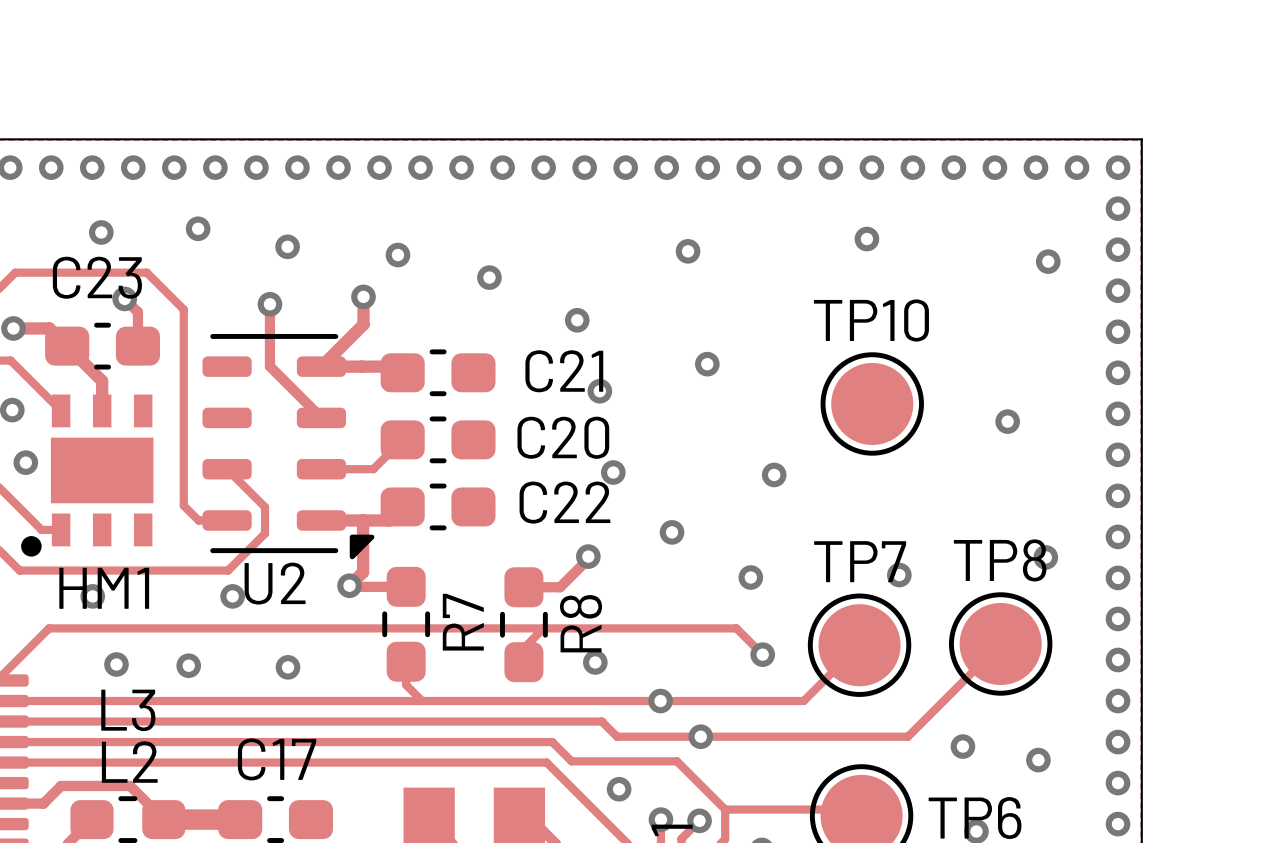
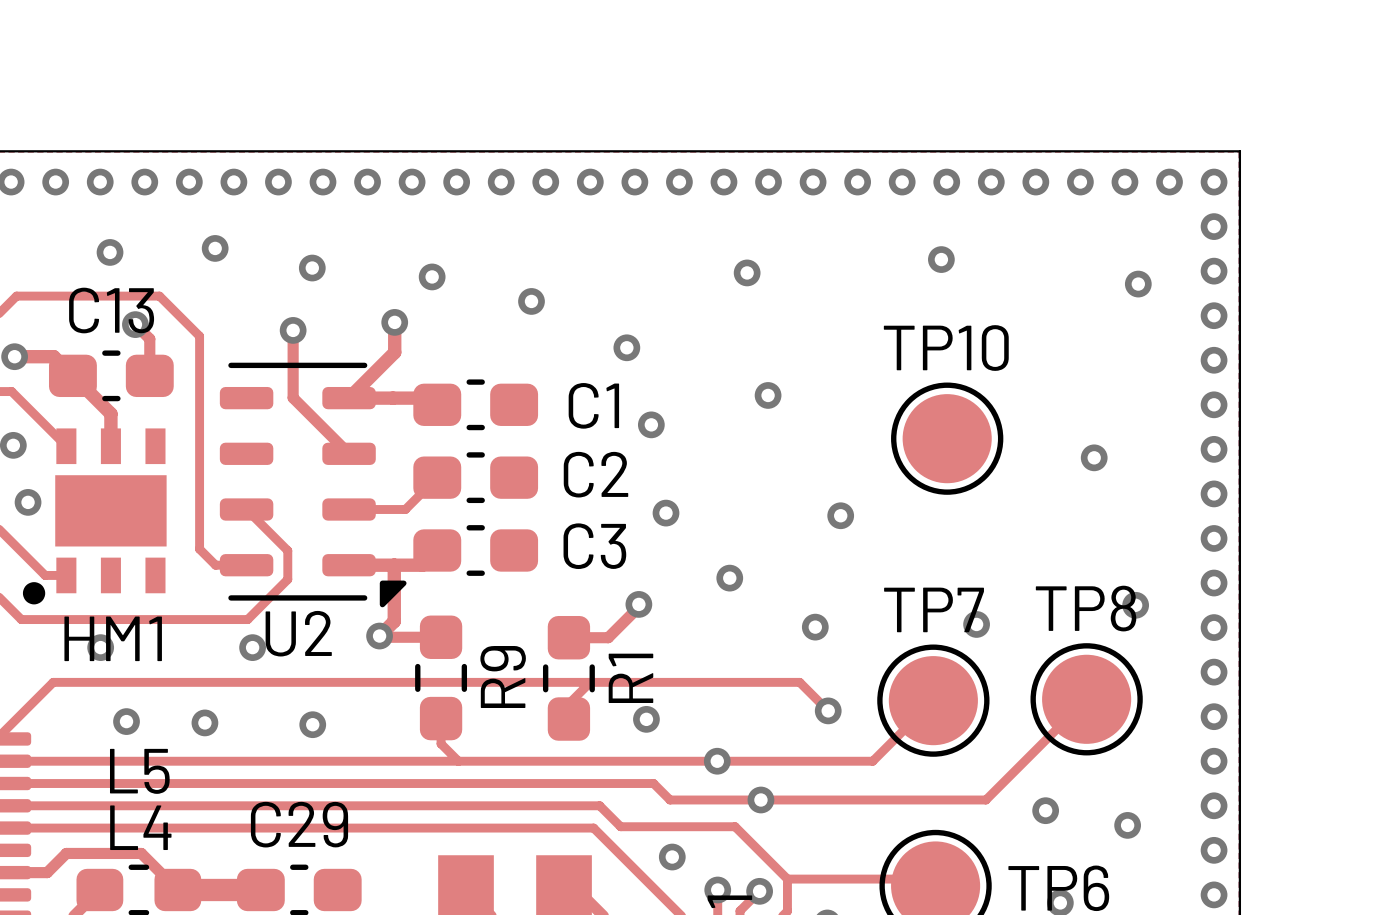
C23 name: C23 (97, 277) -> C13 (111, 310)
C21 name: C21 (564, 371) -> C1 (593, 405)
C20 name: C20 (563, 437) -> C2 (595, 474)
C22 name: C22 (564, 502) -> C3 (594, 546)
R7 name: R7 (463, 622) -> R9 (503, 676)
R8 name: R8 (581, 623) -> R1 (630, 678)
L3 name: L3 (128, 710) -> L5 (139, 771)
C17 name: C17 (277, 759) -> C29 (299, 824)
L2 name: L2 (129, 762) -> L4 (140, 827)

